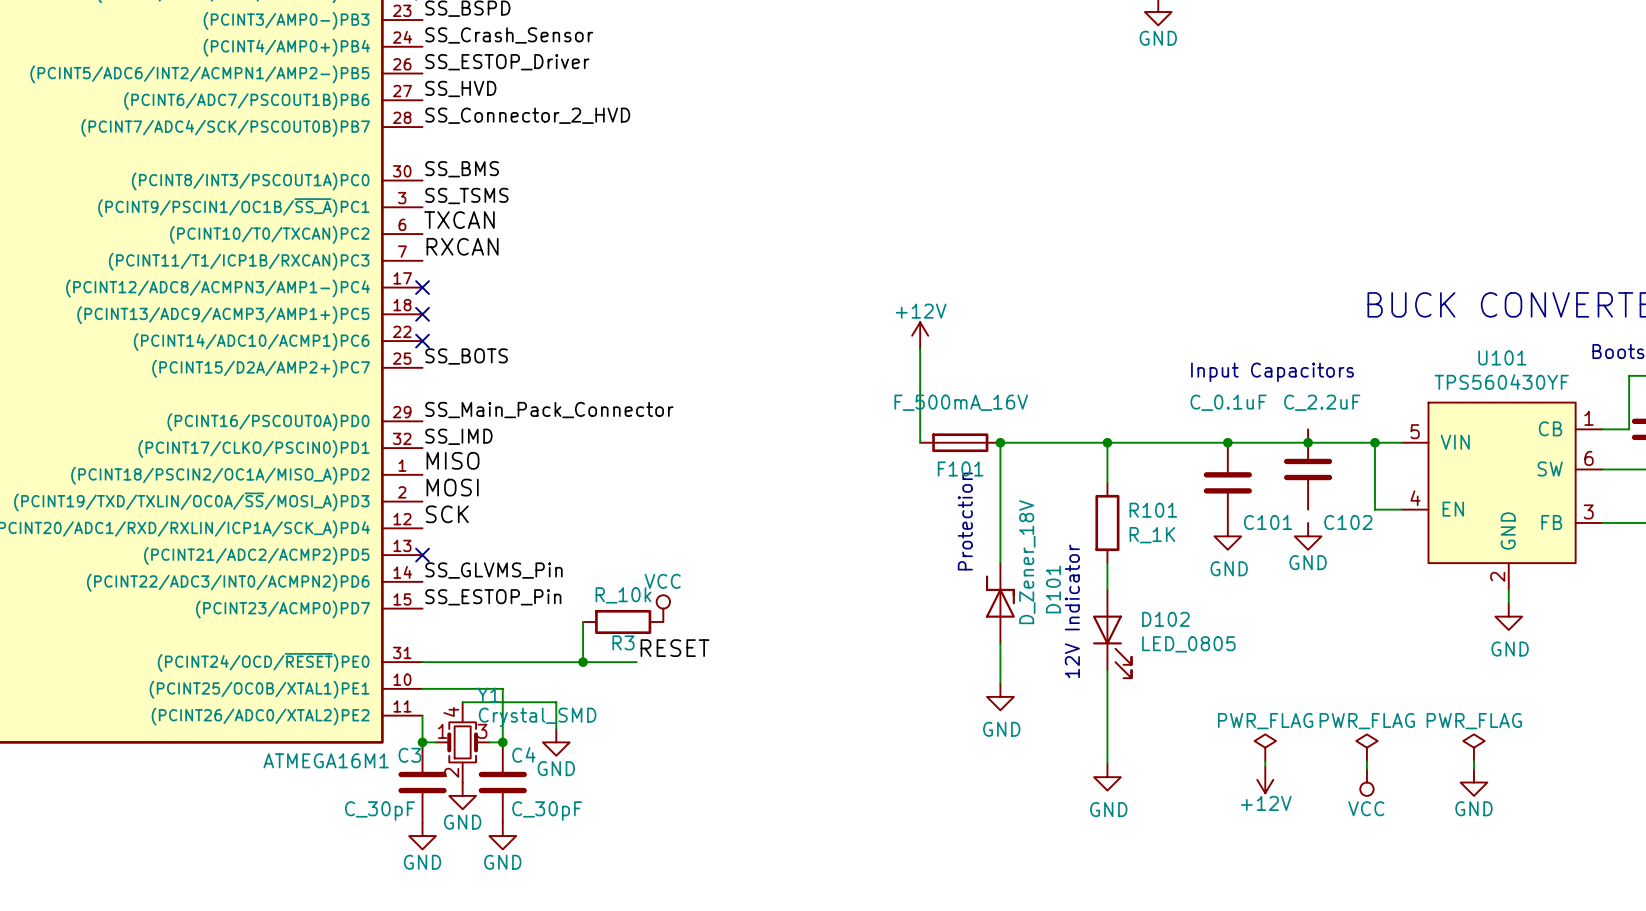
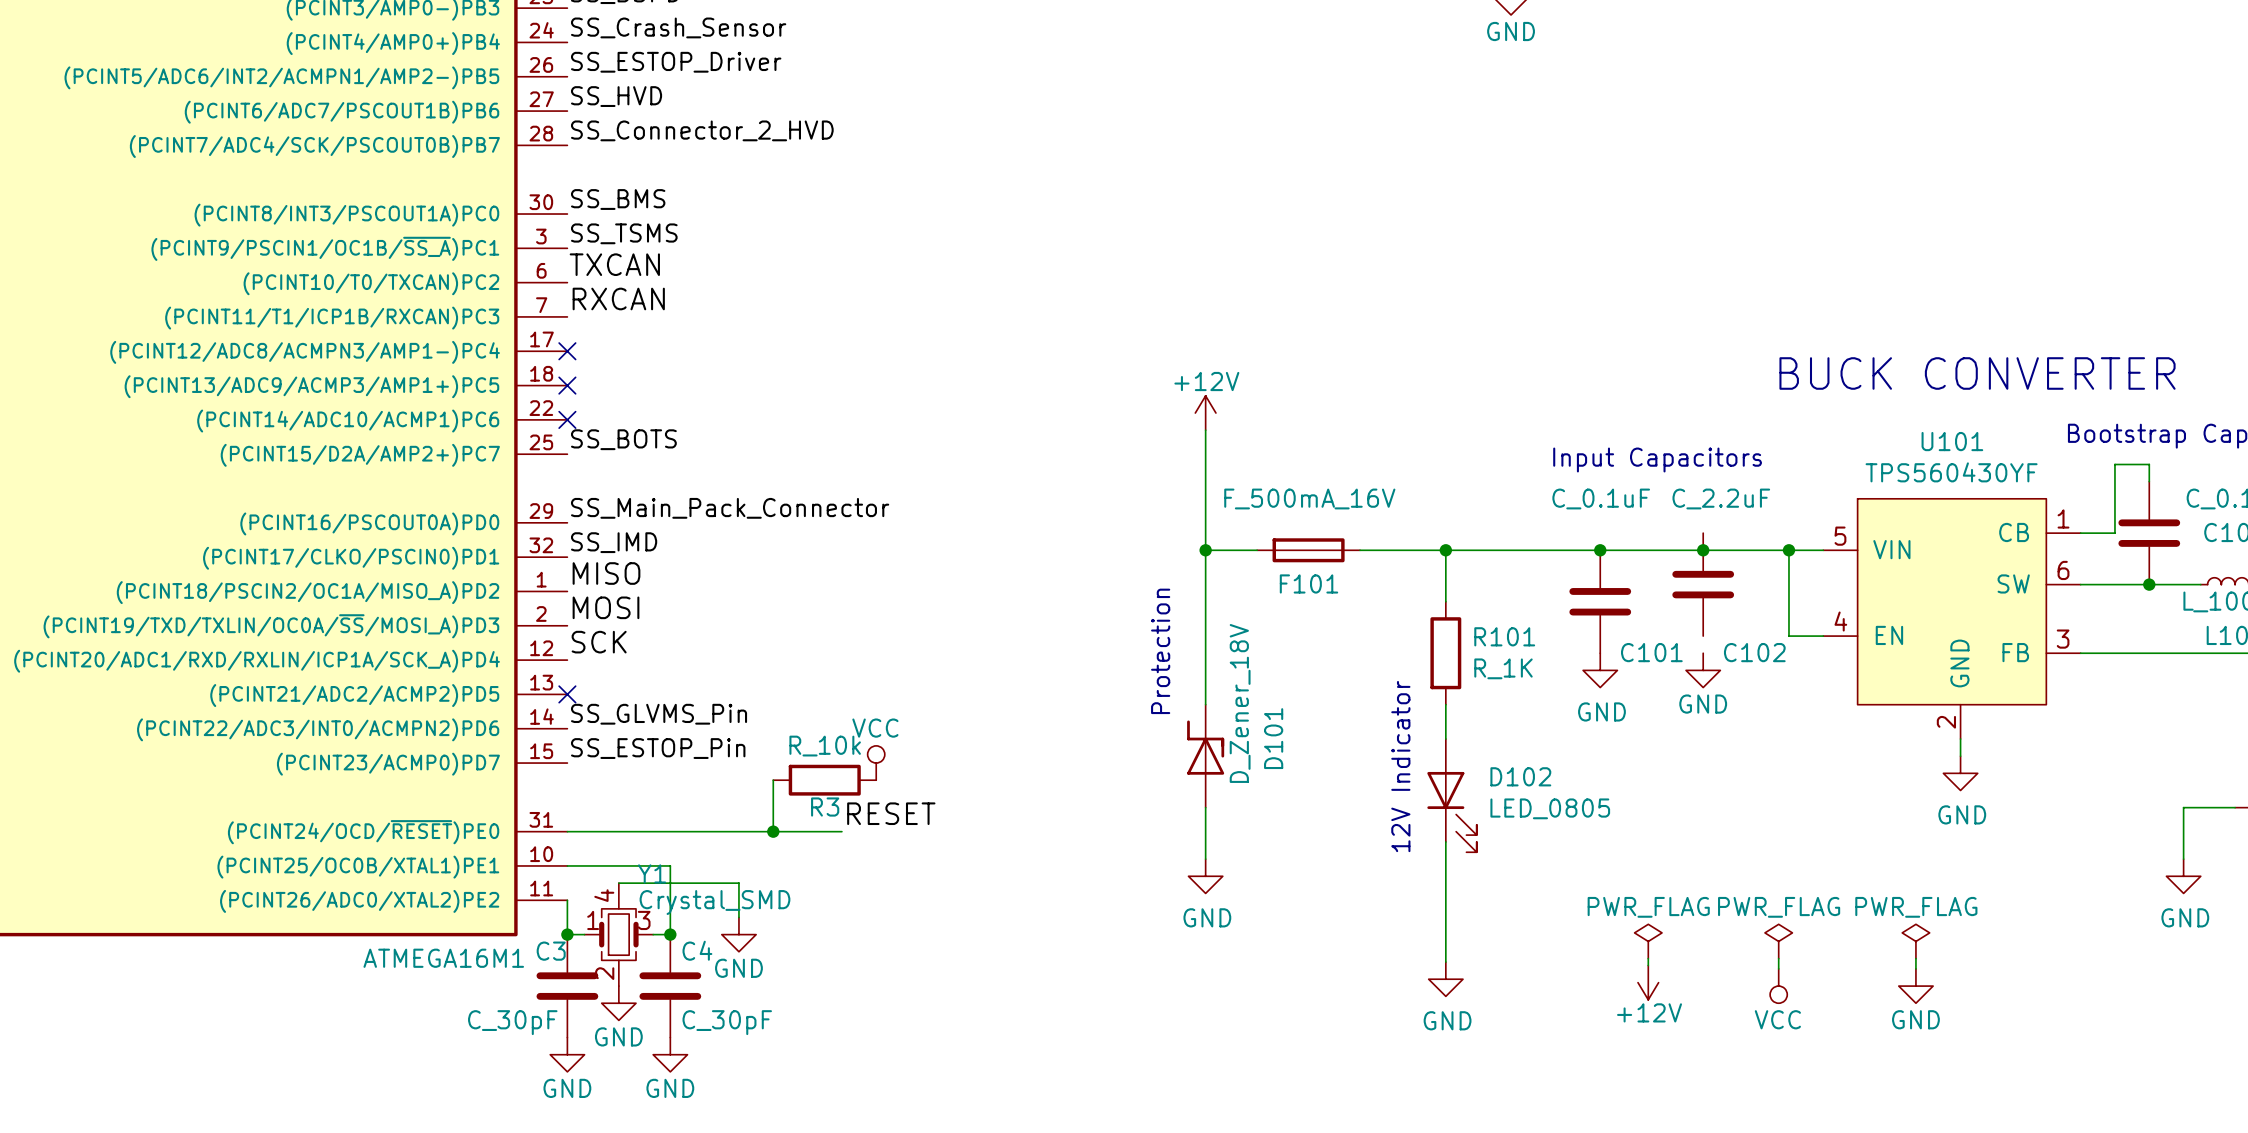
junction: none -> (1205, 550)
F101 position: (960, 442) -> (1308, 550)
junction: (1000, 442) -> none
wire: (1040, 442) (1000, 442) (1000, 563) -> (1257, 550) (1205, 550) (1205, 704)
text position: Protection (965, 521) -> Protection (1160, 651)
D101 position: (1000, 603) -> (1205, 756)
wire: (1000, 643) (1000, 683) -> (1205, 807) (1205, 859)
power symbol position: GND (1000, 696) -> GND (1205, 876)

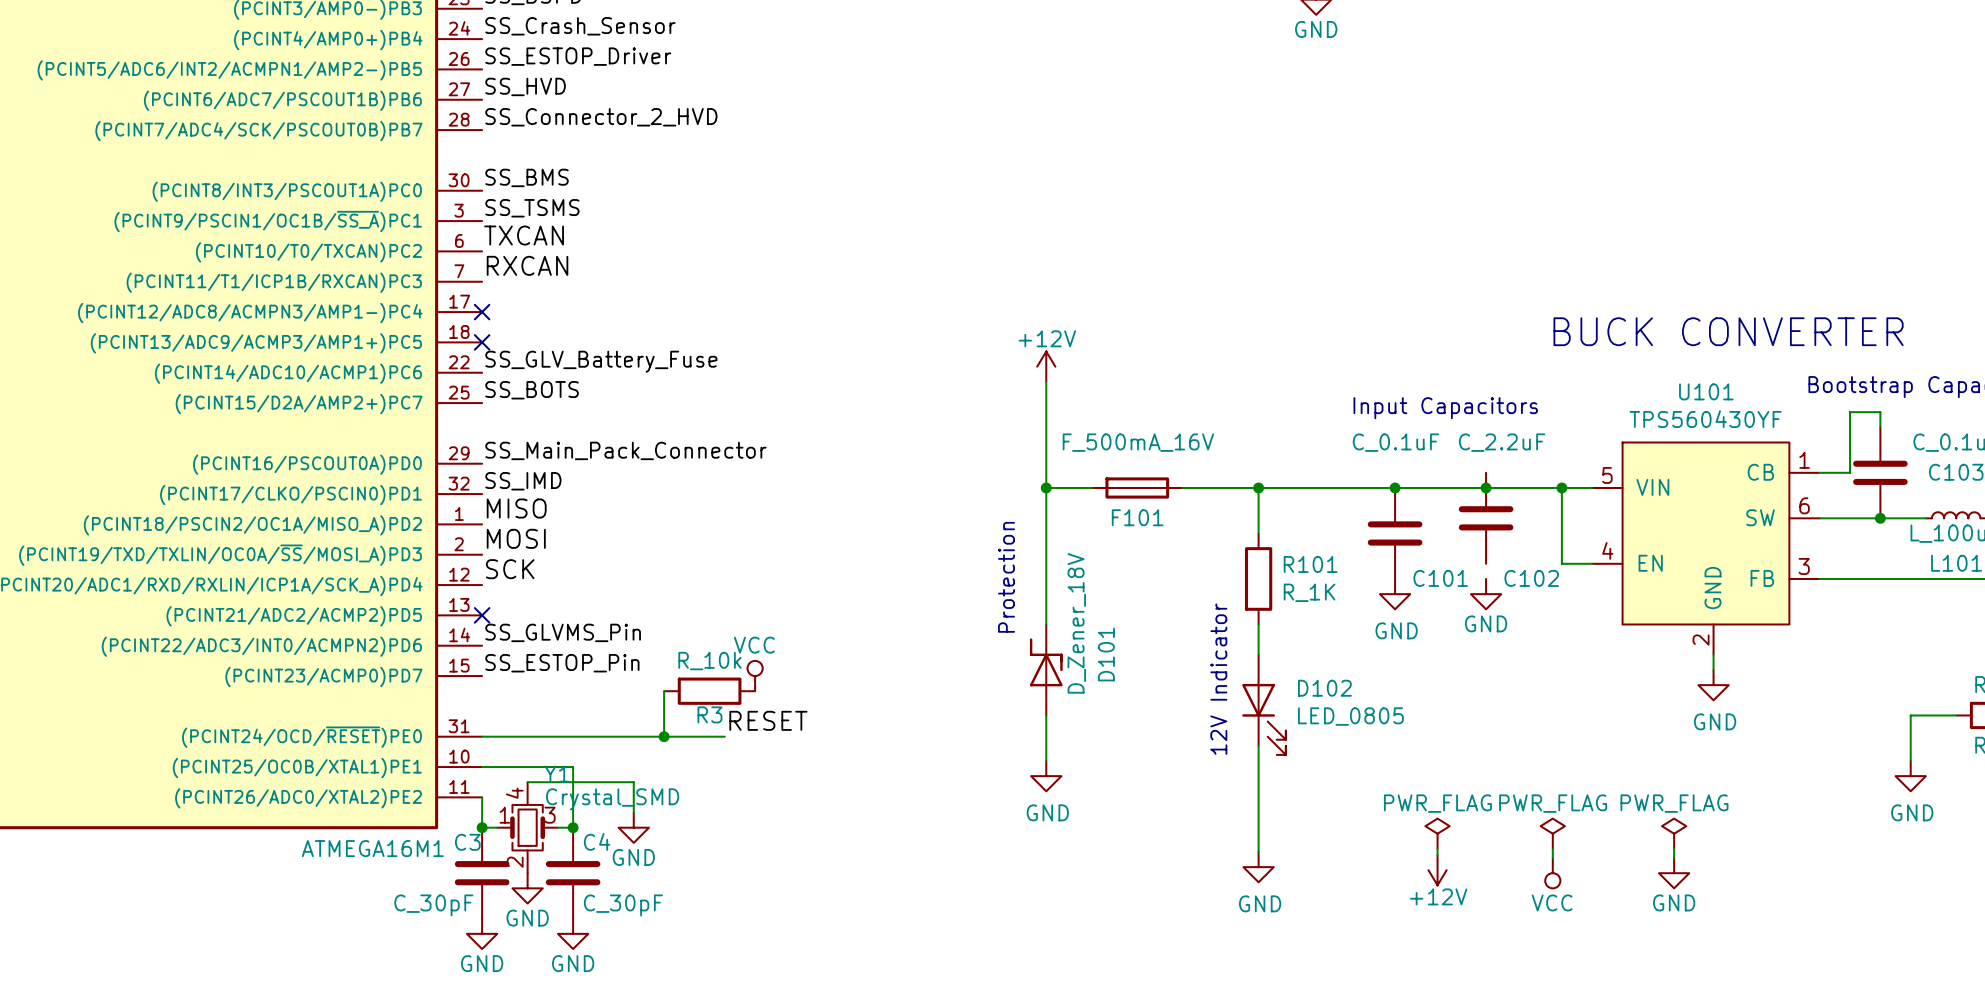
label: none -> SS_GLV_Battery_Fuse (601, 361)
no-connect mark: (567, 419) -> none

